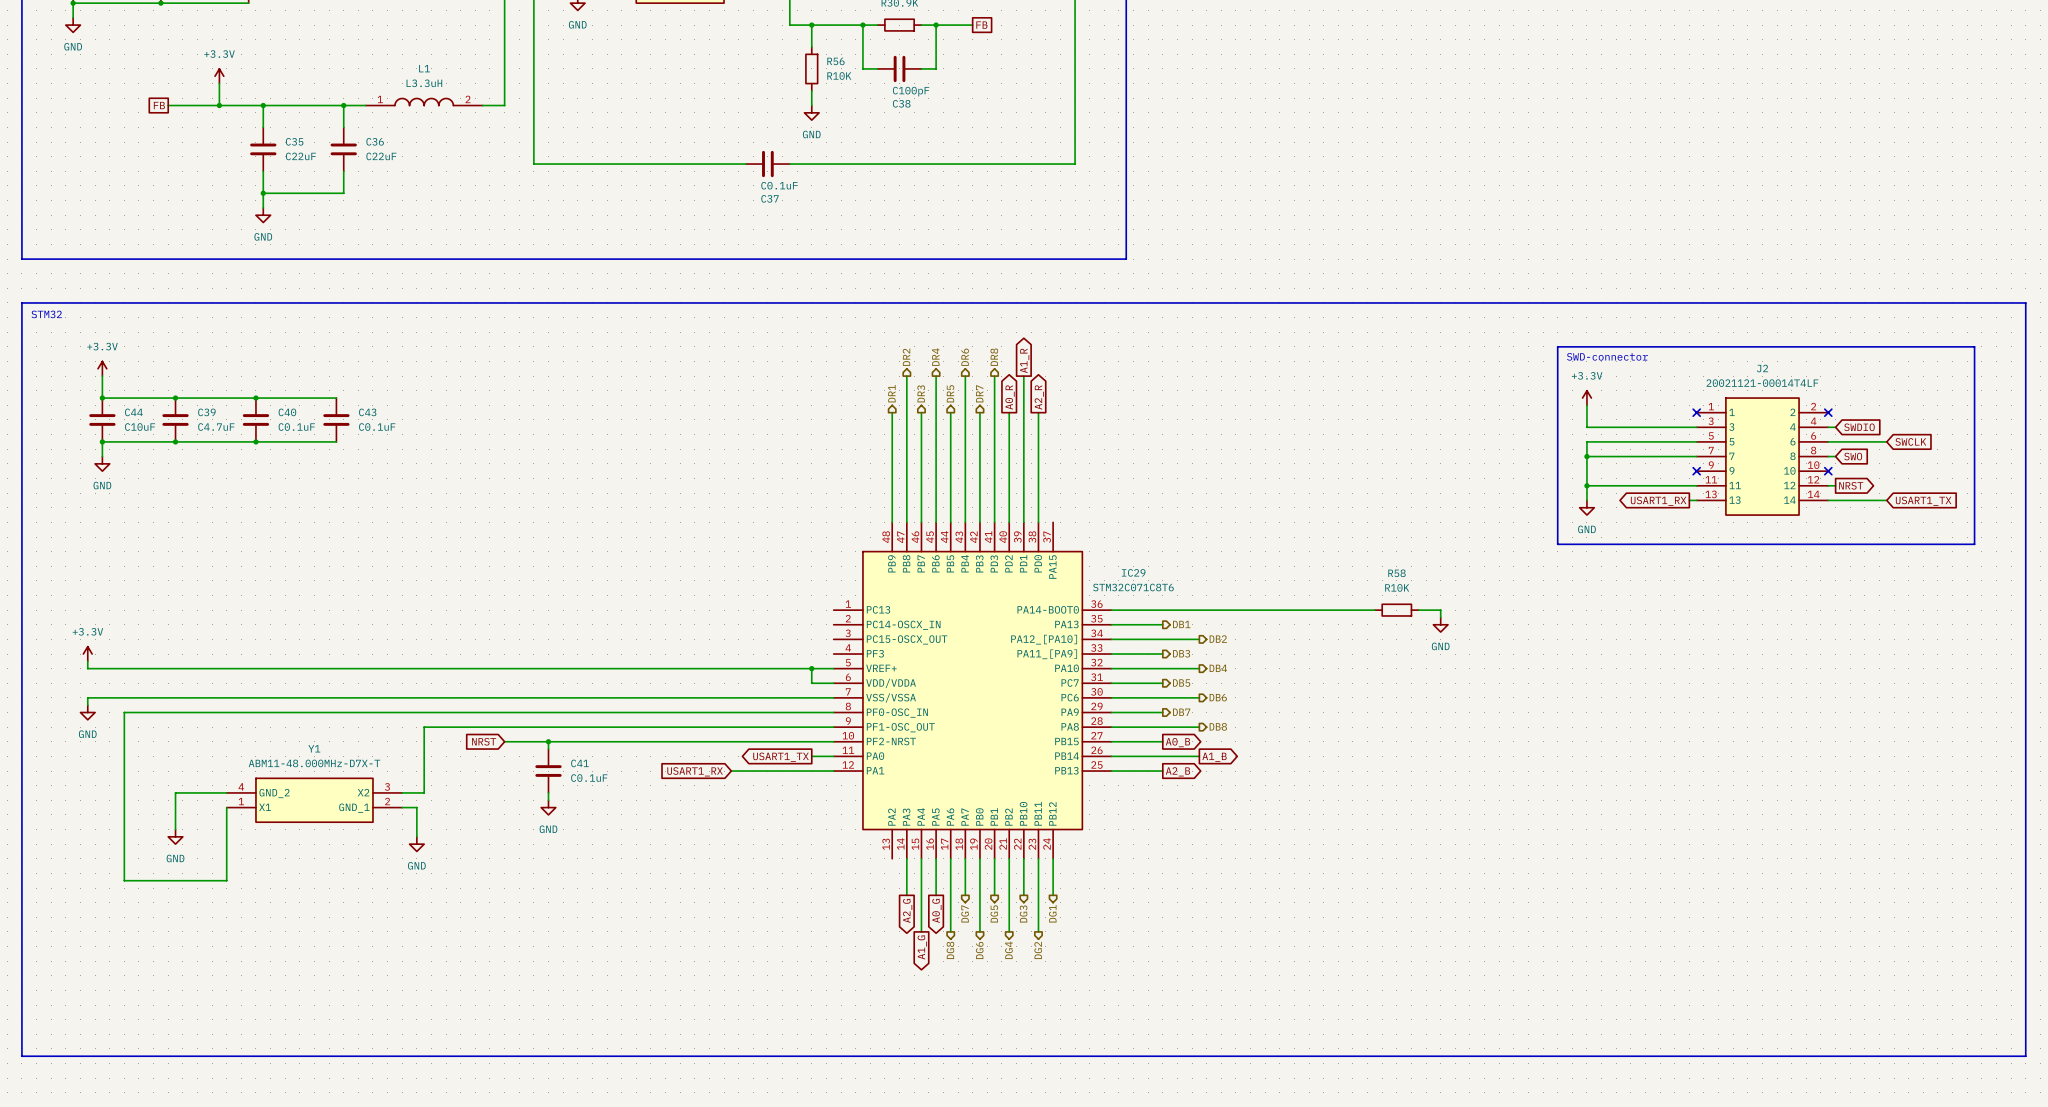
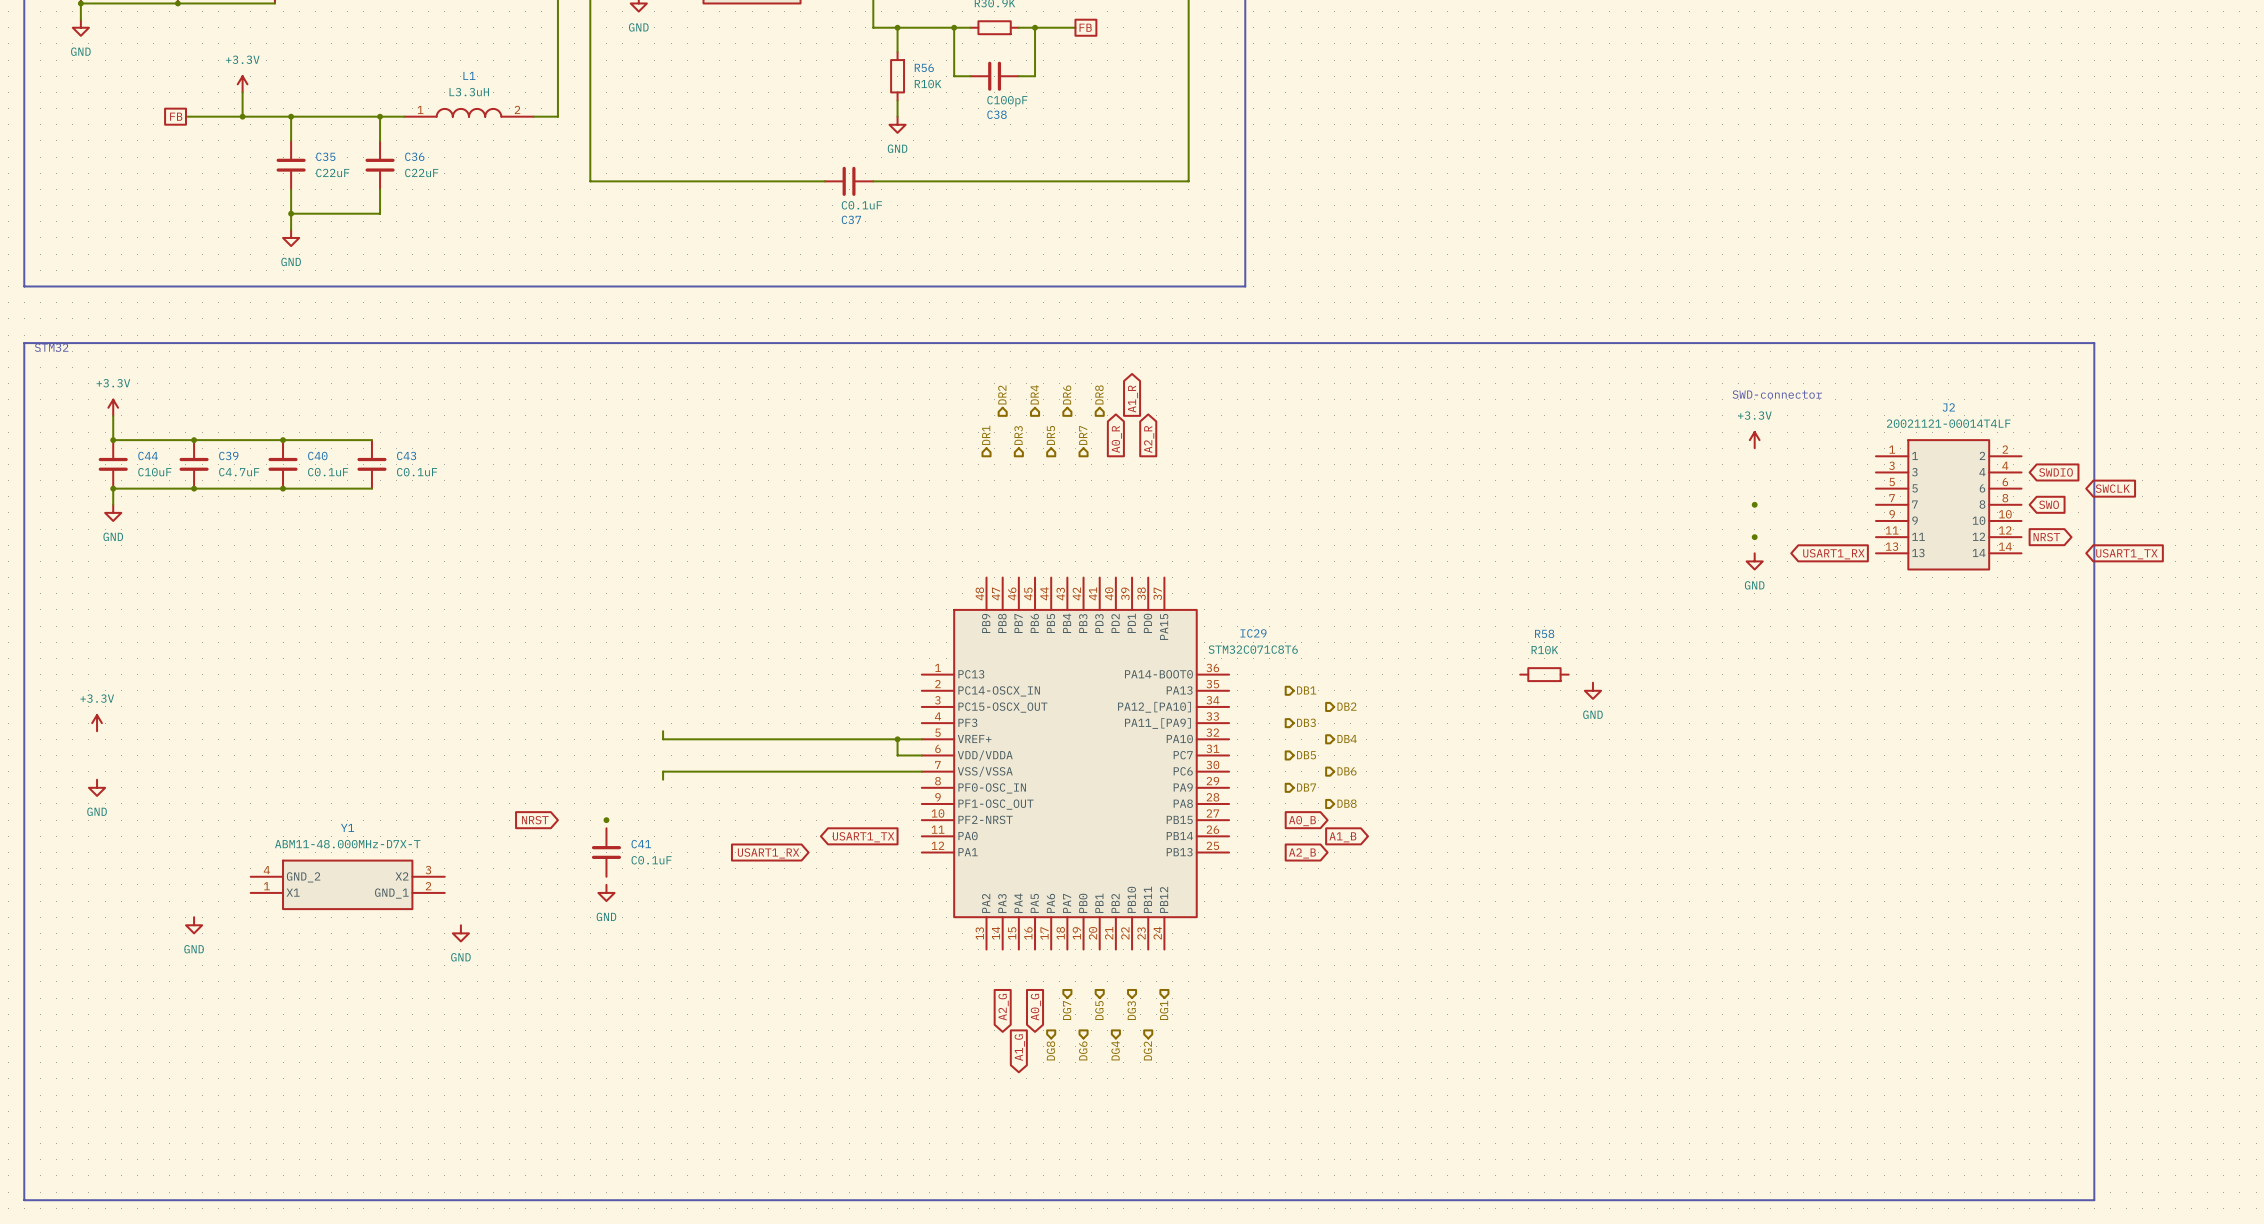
line: (21, 310) (21, 302) (2025, 302) (2025, 1056) (21, 1056) -> (24, 343) (2094, 343) (2094, 1200) (24, 1200) (24, 1167)
line: (1557, 346) (1974, 346) (1974, 544) (1557, 544) (1557, 346) -> none
wire: (906, 376) (906, 522) -> none
wire: (936, 376) (936, 522) -> none
wire: (965, 376) (965, 522) -> none
wire: (994, 376) (994, 522) -> none
wire: (1023, 376) (1023, 522) -> none
wire: (1586, 405) (1586, 427) (1696, 427) -> none
wire: (892, 412) (892, 522) -> none
wire: (921, 412) (921, 522) -> none
wire: (950, 412) (950, 522) -> none
wire: (979, 412) (979, 522) -> none
wire: (1009, 412) (1009, 522) -> none
wire: (1038, 412) (1038, 522) -> none
no-connect mark: (1696, 412) -> none
no-connect mark: (1828, 412) -> none
wire: (1828, 427) (1835, 427) -> none
wire: (1696, 441) (1586, 441) (1586, 500) -> none
wire: (1828, 441) (1886, 441) -> none
wire: (1586, 456) (1696, 456) -> none
wire: (1828, 456) (1835, 456) -> none
no-connect mark: (1696, 471) -> none
no-connect mark: (1828, 471) -> none
wire: (1586, 485) (1696, 485) -> none
wire: (1828, 485) (1835, 485) -> none
wire: (1689, 500) (1696, 500) -> none
wire: (1828, 500) (1886, 500) -> none
wire: (1111, 610) (1374, 610) -> none
wire: (1418, 610) (1440, 610) (1440, 617) -> none
wire: (1111, 624) (1162, 624) -> none
wire: (1111, 639) (1199, 639) -> none
wire: (1111, 654) (1162, 654) -> none
wire: (87, 661) (87, 668) (599, 668) -> (663, 731) (663, 739)
wire: (1111, 668) (1199, 668) -> none
wire: (1111, 683) (1162, 683) -> none
wire: (599, 697) (87, 697) (87, 705) -> (663, 771) (663, 779)
wire: (1111, 697) (1199, 697) -> none
wire: (833, 712) (124, 712) (124, 880) (226, 880) (226, 807) -> none
wire: (1111, 712) (1162, 712) -> none
wire: (833, 727) (424, 727) (424, 792) (402, 792) -> none
wire: (1111, 727) (1199, 727) -> none
wire: (504, 741) (833, 741) -> none
wire: (548, 741) (548, 749) -> none
wire: (1111, 741) (1162, 741) -> none
wire: (811, 756) (833, 756) -> none
wire: (1111, 756) (1199, 756) -> none
wire: (731, 771) (833, 771) -> none
wire: (1111, 771) (1162, 771) -> none
wire: (226, 792) (175, 792) (175, 829) -> none
wire: (548, 792) (548, 800) -> none
wire: (402, 807) (416, 807) (416, 836) -> none
wire: (906, 858) (906, 895) -> none
wire: (921, 858) (921, 931) -> none
wire: (936, 858) (936, 895) -> none
wire: (950, 858) (950, 931) -> none
wire: (965, 858) (965, 895) -> none
wire: (979, 858) (979, 931) -> none
wire: (994, 858) (994, 895) -> none
wire: (1009, 858) (1009, 931) -> none
wire: (1023, 858) (1023, 895) -> none
wire: (1038, 858) (1038, 931) -> none
wire: (1053, 858) (1053, 895) -> none

